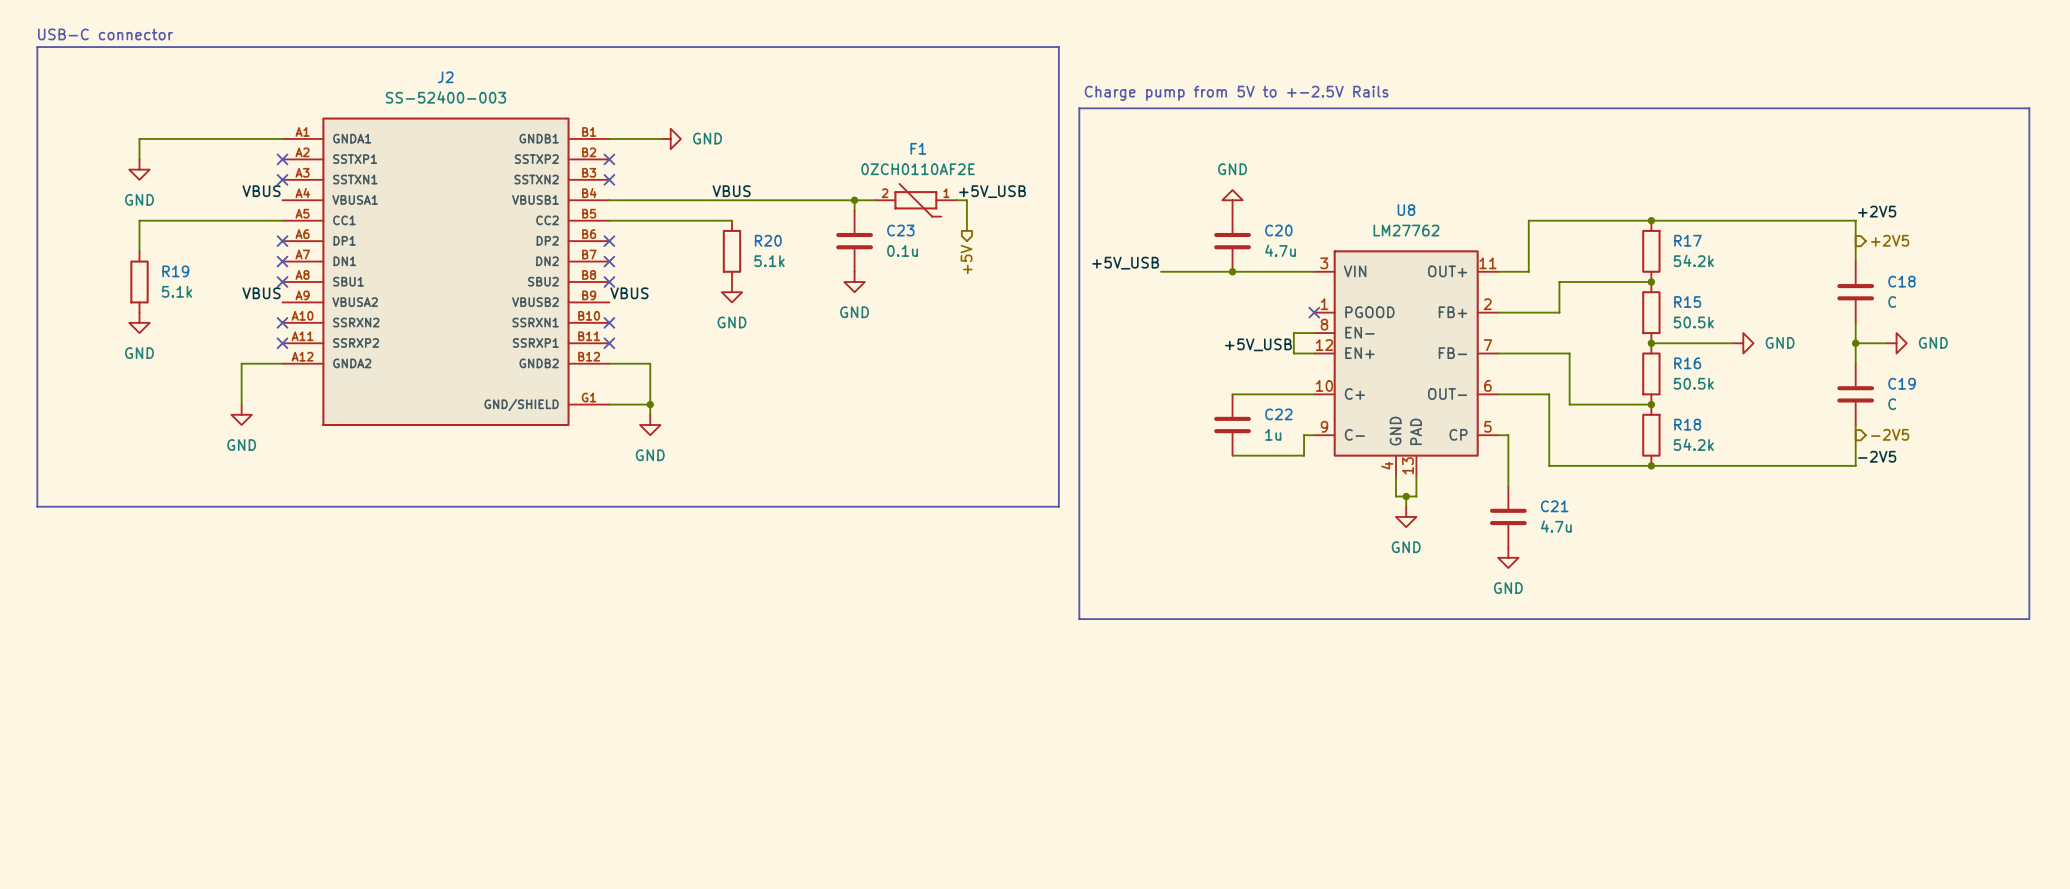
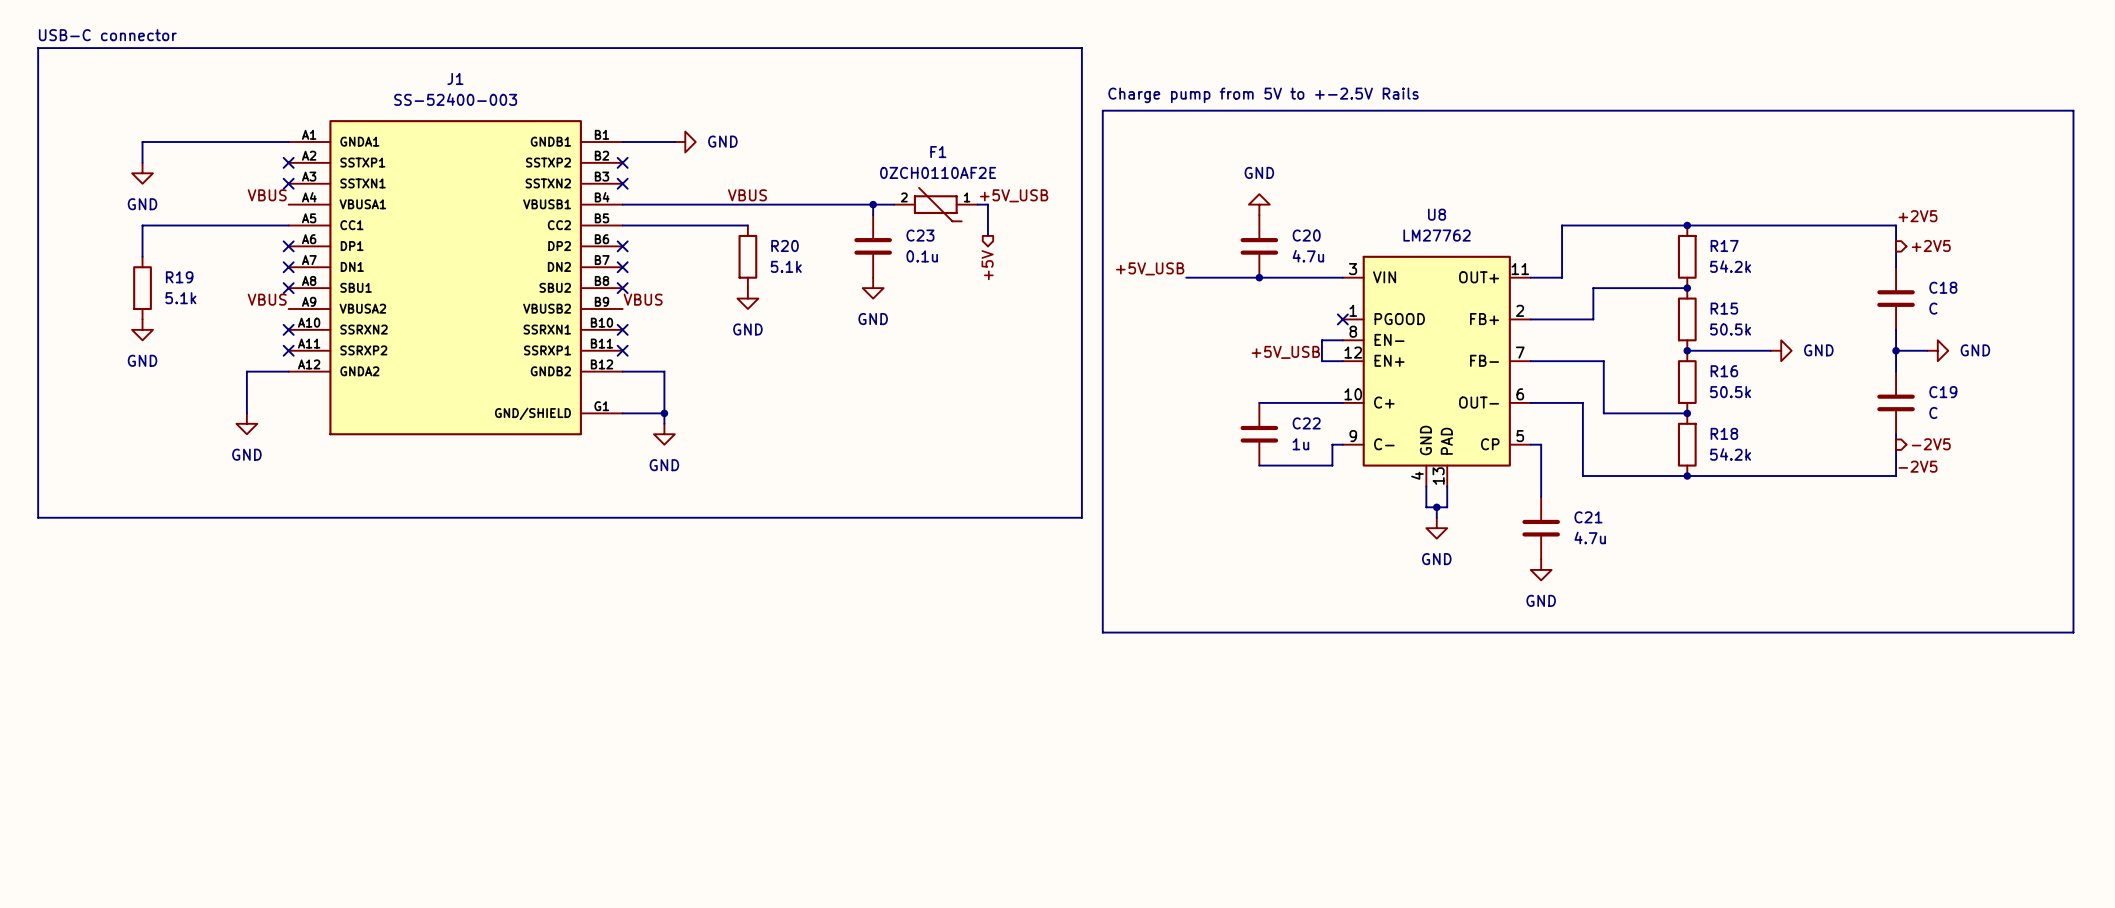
J2 name: J2 (445, 77) -> J1 (455, 78)

